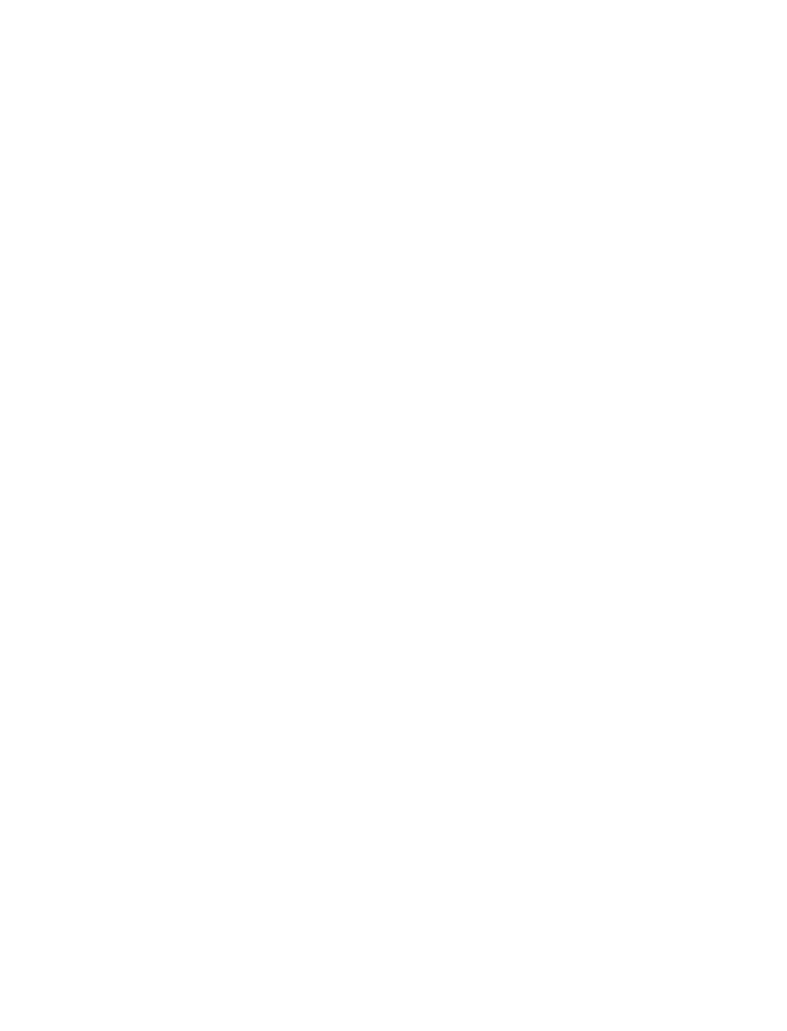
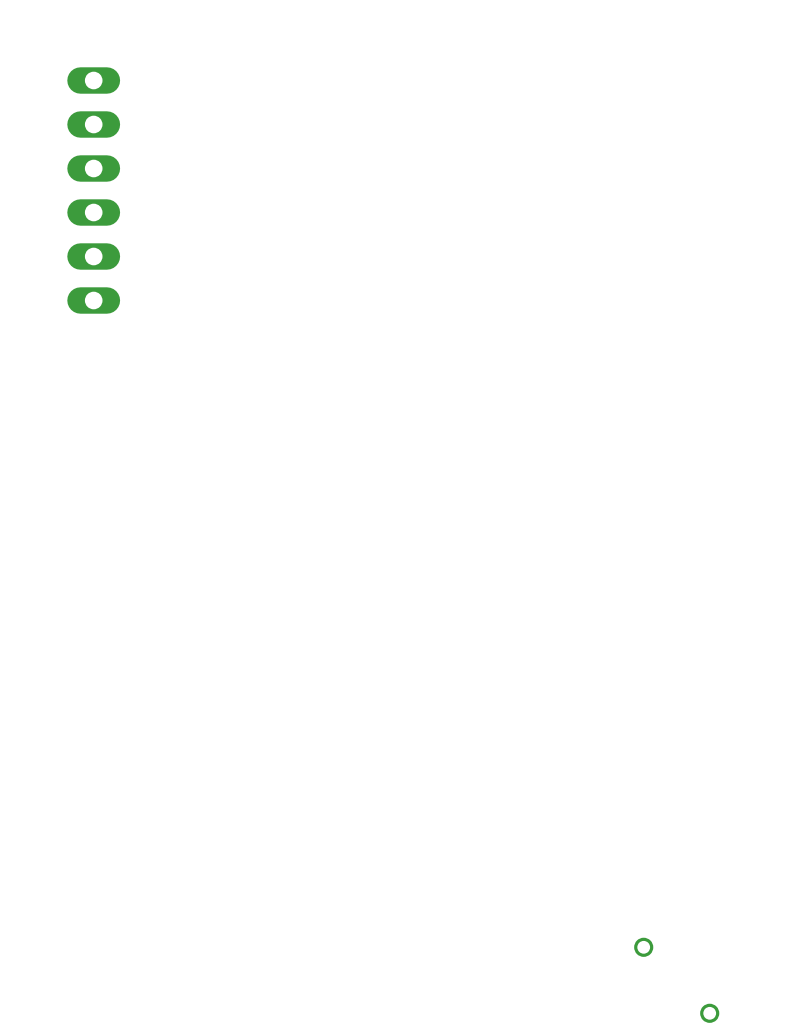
part: none -> (93, 190)
part: none -> (643, 947)
part: none -> (709, 1013)

